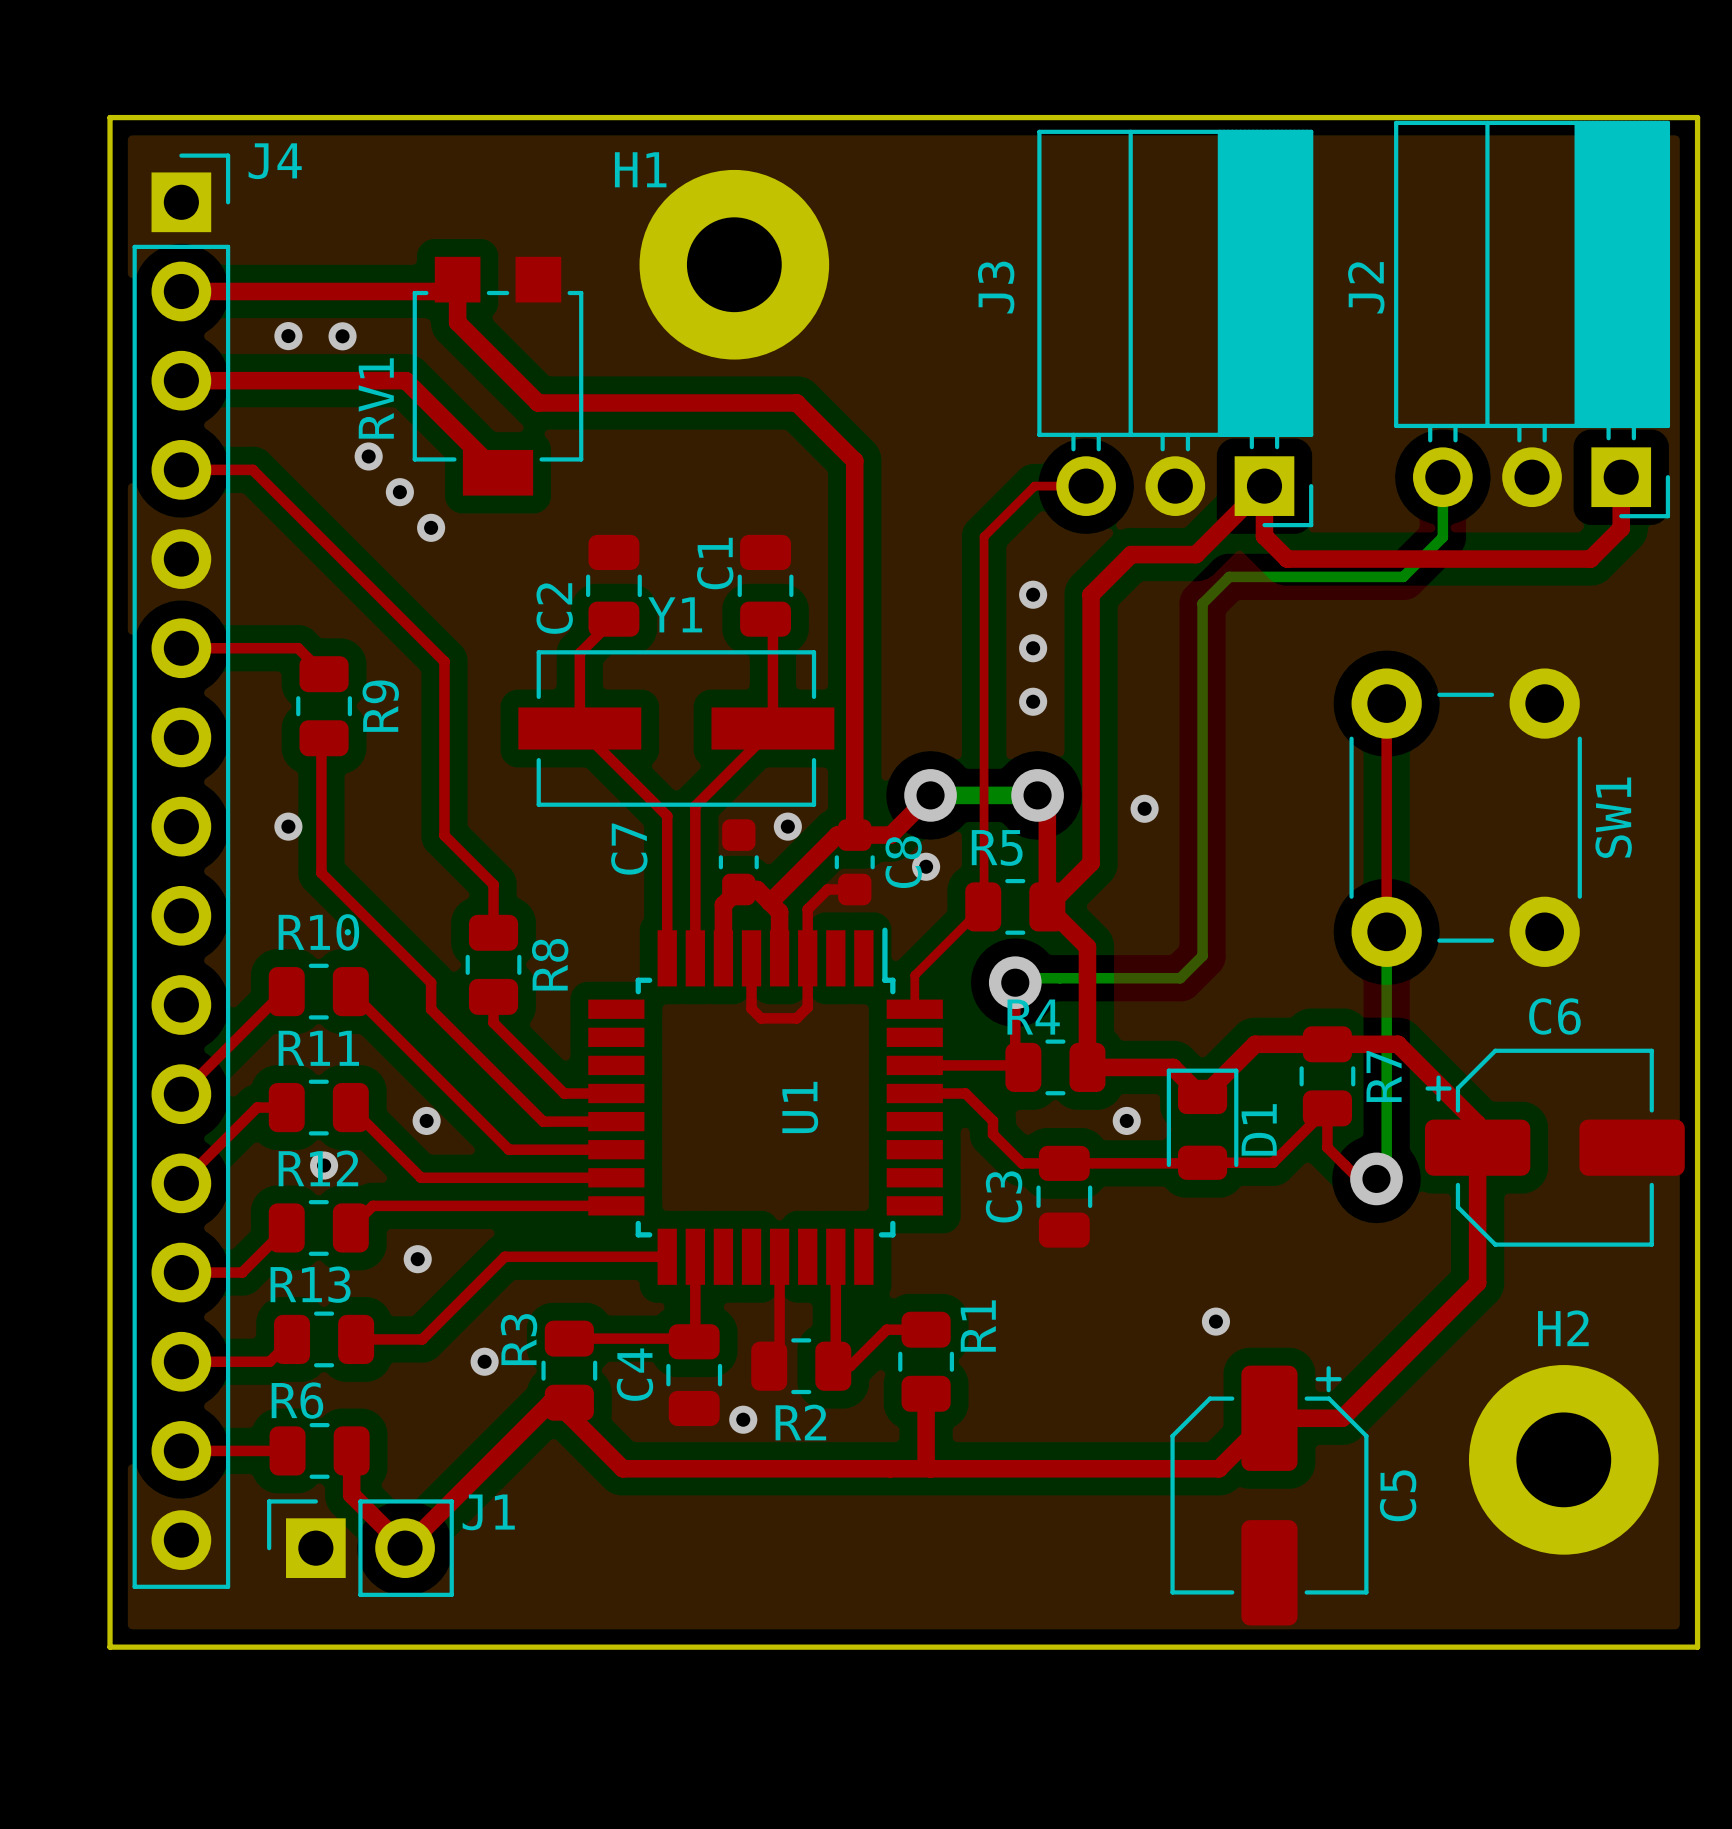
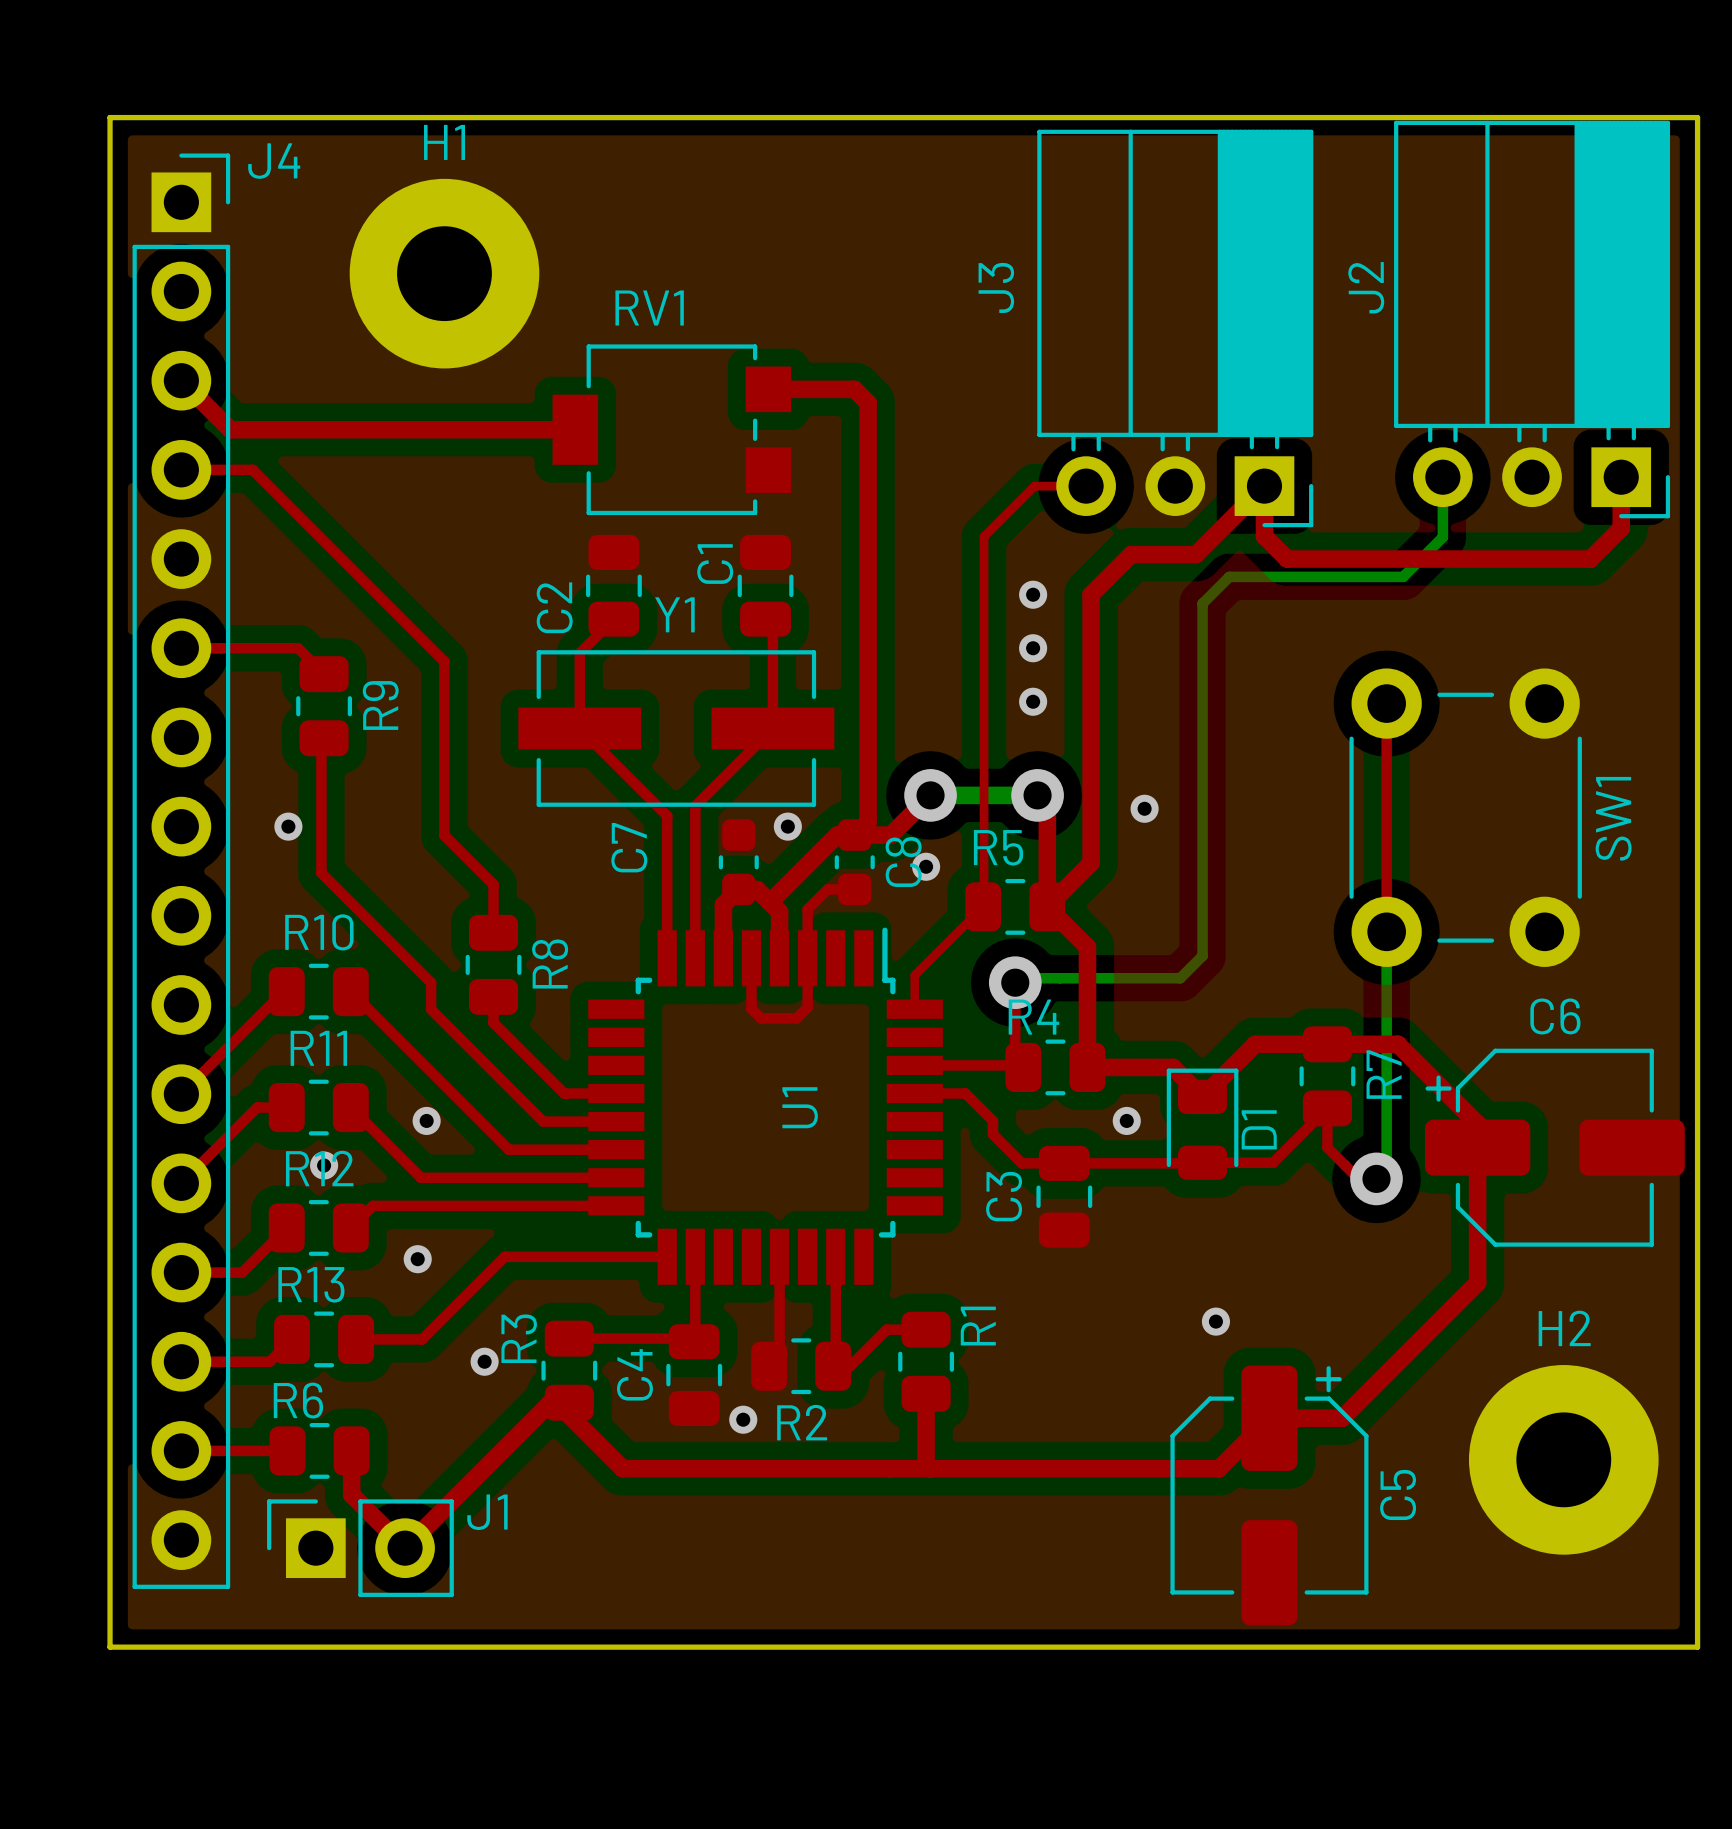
H1 name position: H1 (640, 169) -> H1 (444, 142)
H1 position: (734, 264) -> (444, 273)
top track: (181, 291) (445, 291) (457, 279) (457, 322) (538, 402) (796, 402) (854, 460) (854, 835) -> (768, 389) (854, 389) (868, 402) (868, 821) (854, 835)
via: (288, 336) -> none
via: (342, 336) -> none
RV1 rotation: 0° (497, 376) -> 90° clockwise (671, 429)
RV1 position: (497, 376) -> (671, 429)
top track: (181, 380) (405, 380) (497, 472) -> (181, 380) (230, 429) (575, 429)
via: (368, 456) -> none
via: (399, 492) -> none
via: (431, 527) -> none

